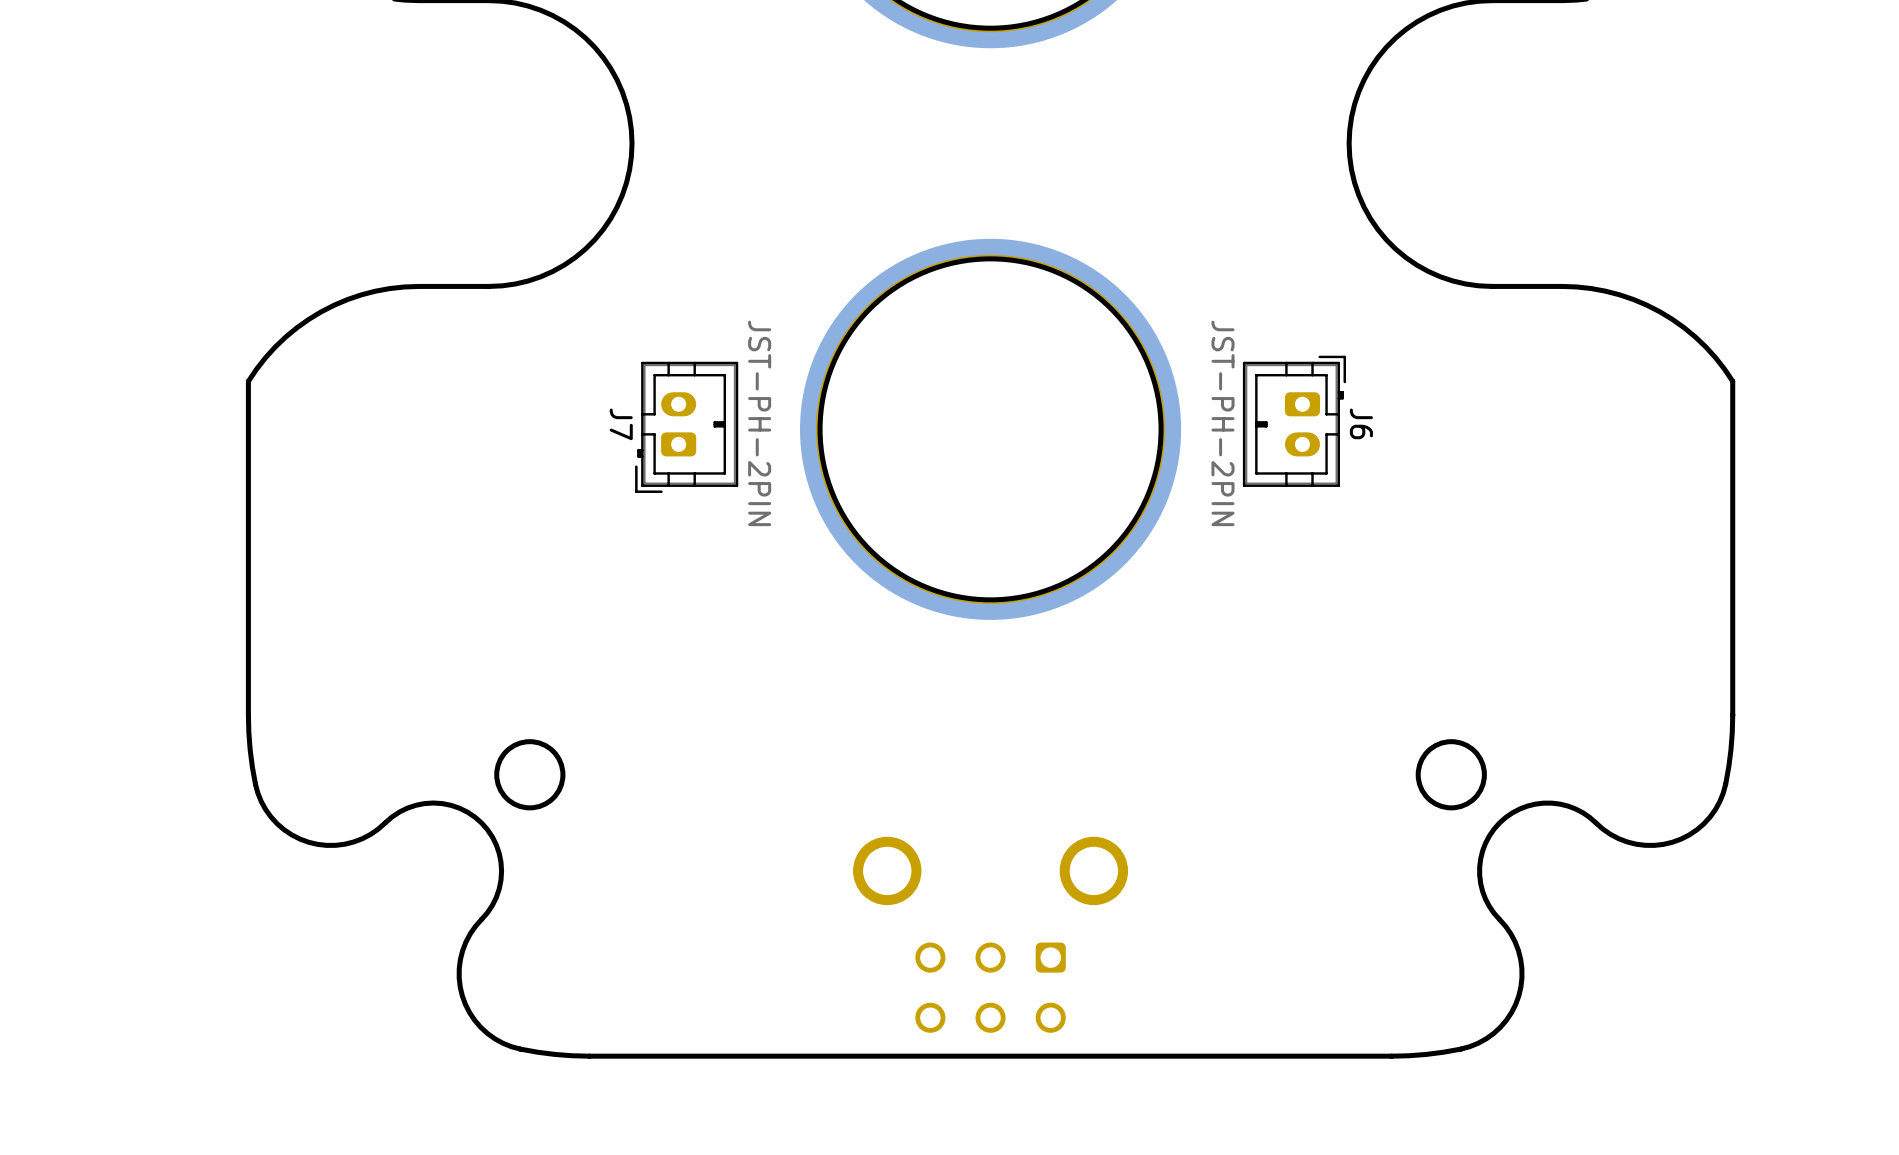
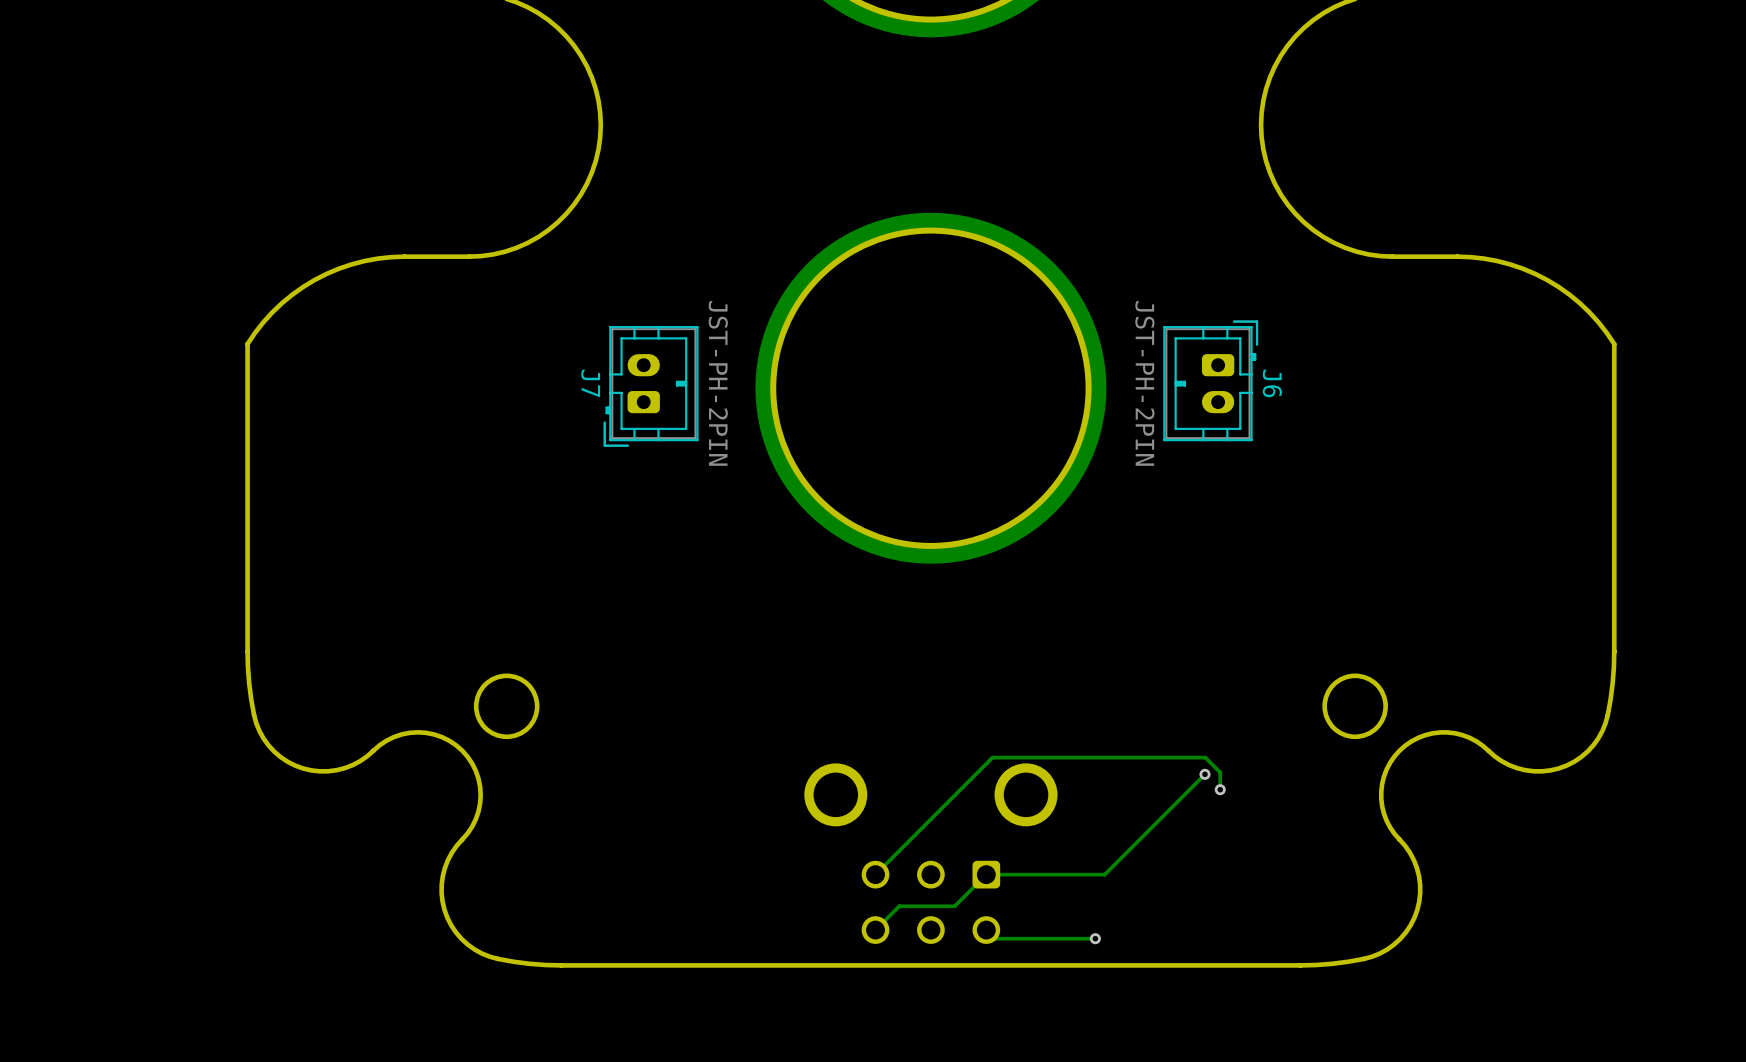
track: none -> (1205, 774) (1104, 874) (986, 874) (954, 906) (899, 906) (875, 930)
via: none -> (1205, 774)
track: none -> (1220, 789) (1220, 772) (1205, 757) (992, 757) (875, 874)
via: none -> (1220, 789)
track: none -> (986, 930) (994, 938) (1095, 938)
via: none -> (1095, 938)

